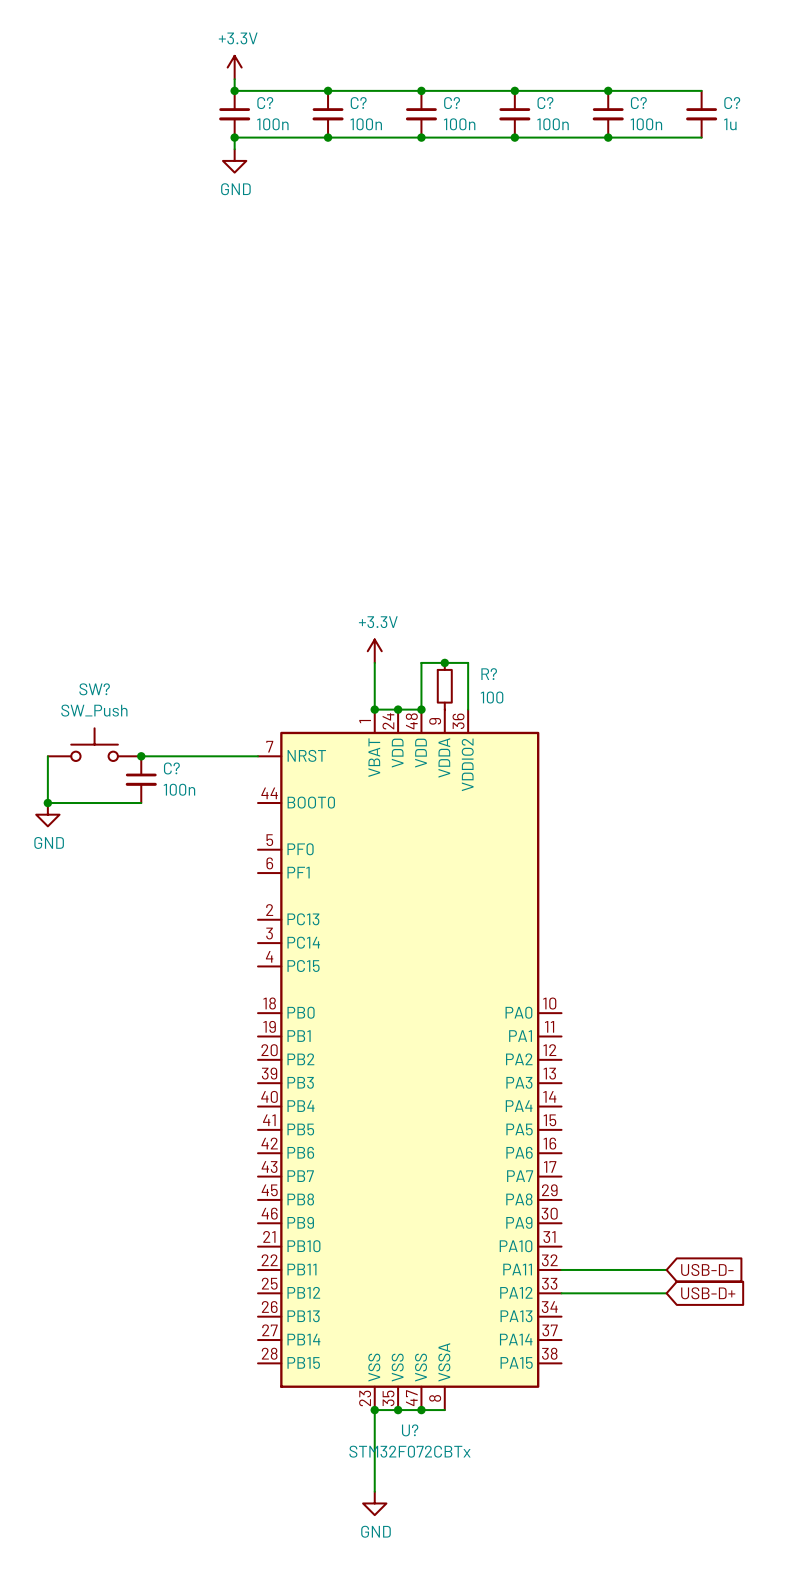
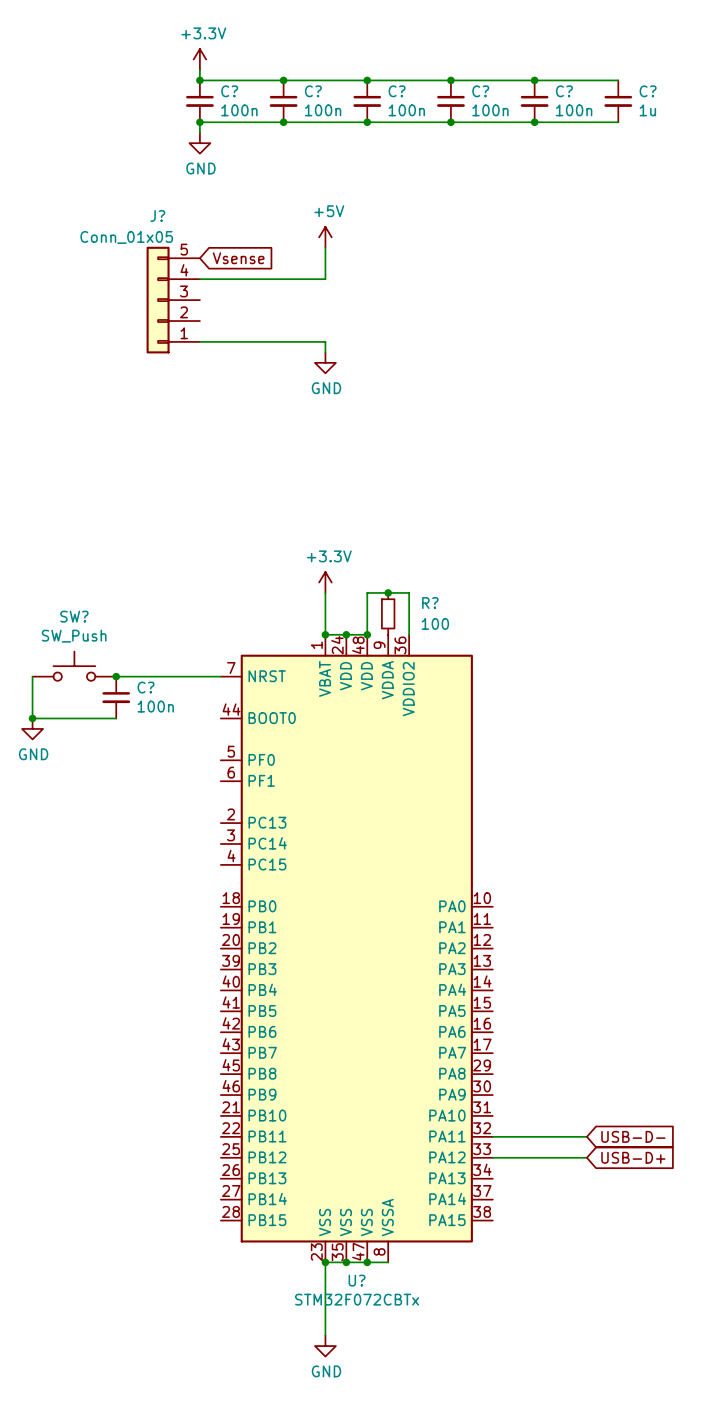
power symbol: none -> +5V (325, 237)
wire: none -> (325, 247) (325, 279) (199, 279)
global label: none -> Vsense (238, 258)
J?: none -> Conn_01x05 (173, 300)
wire: none -> (199, 341) (325, 341) (325, 352)
power symbol: none -> GND (325, 362)

